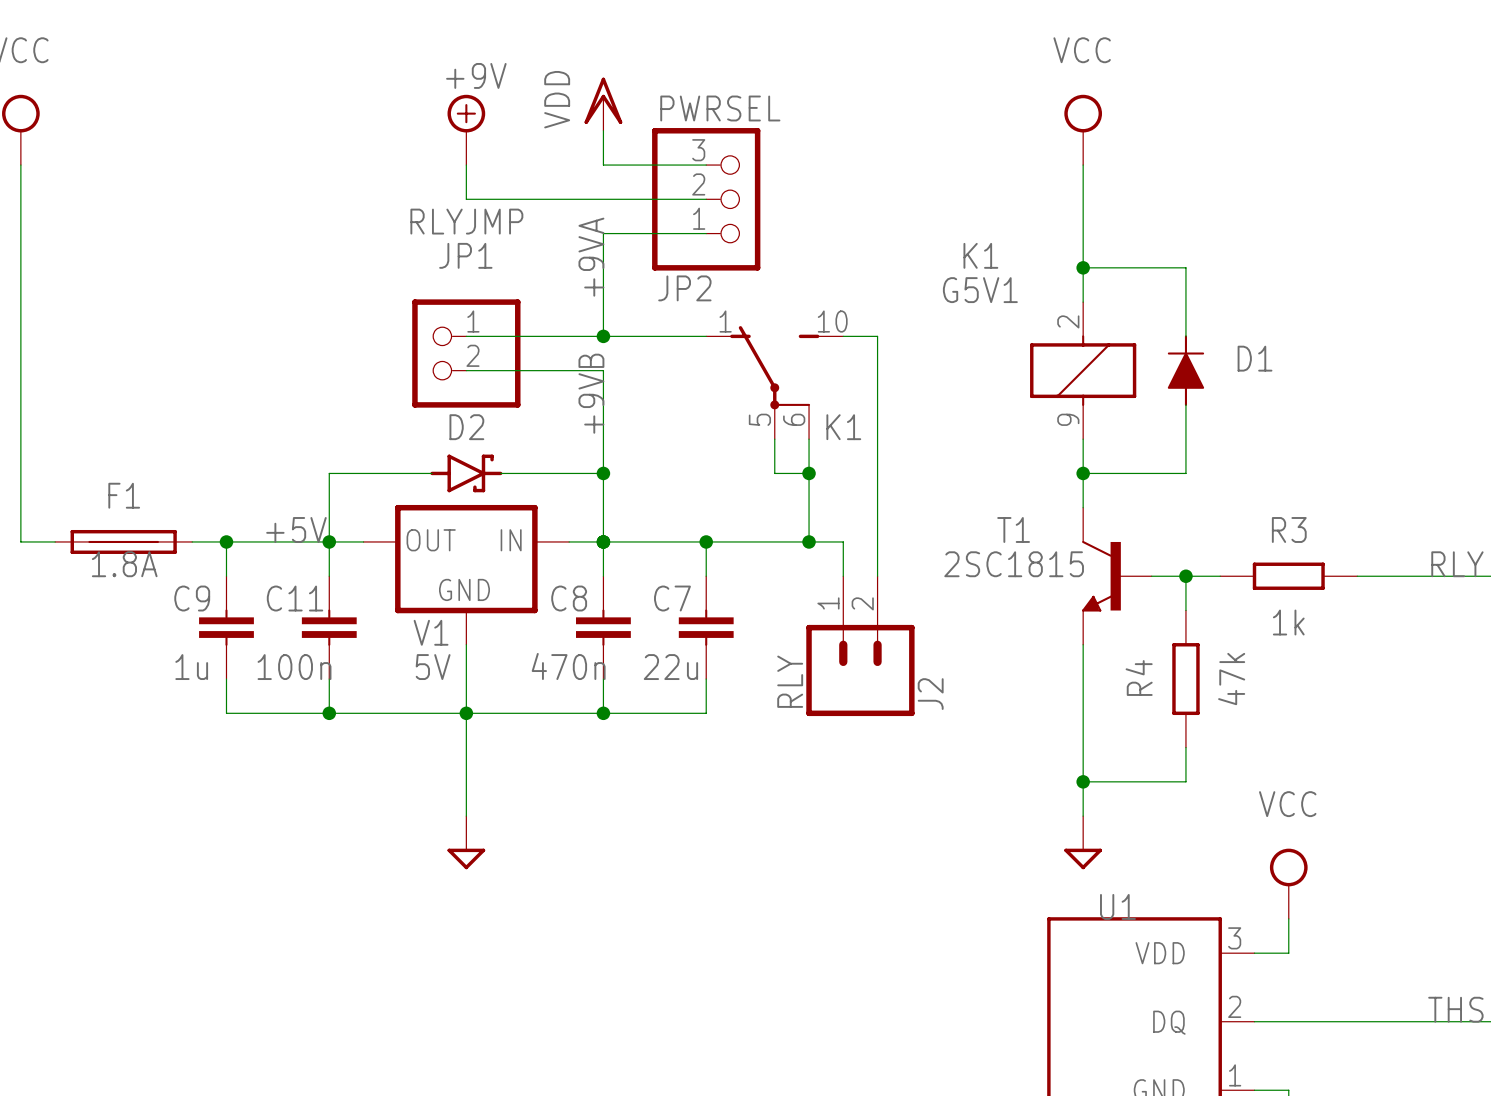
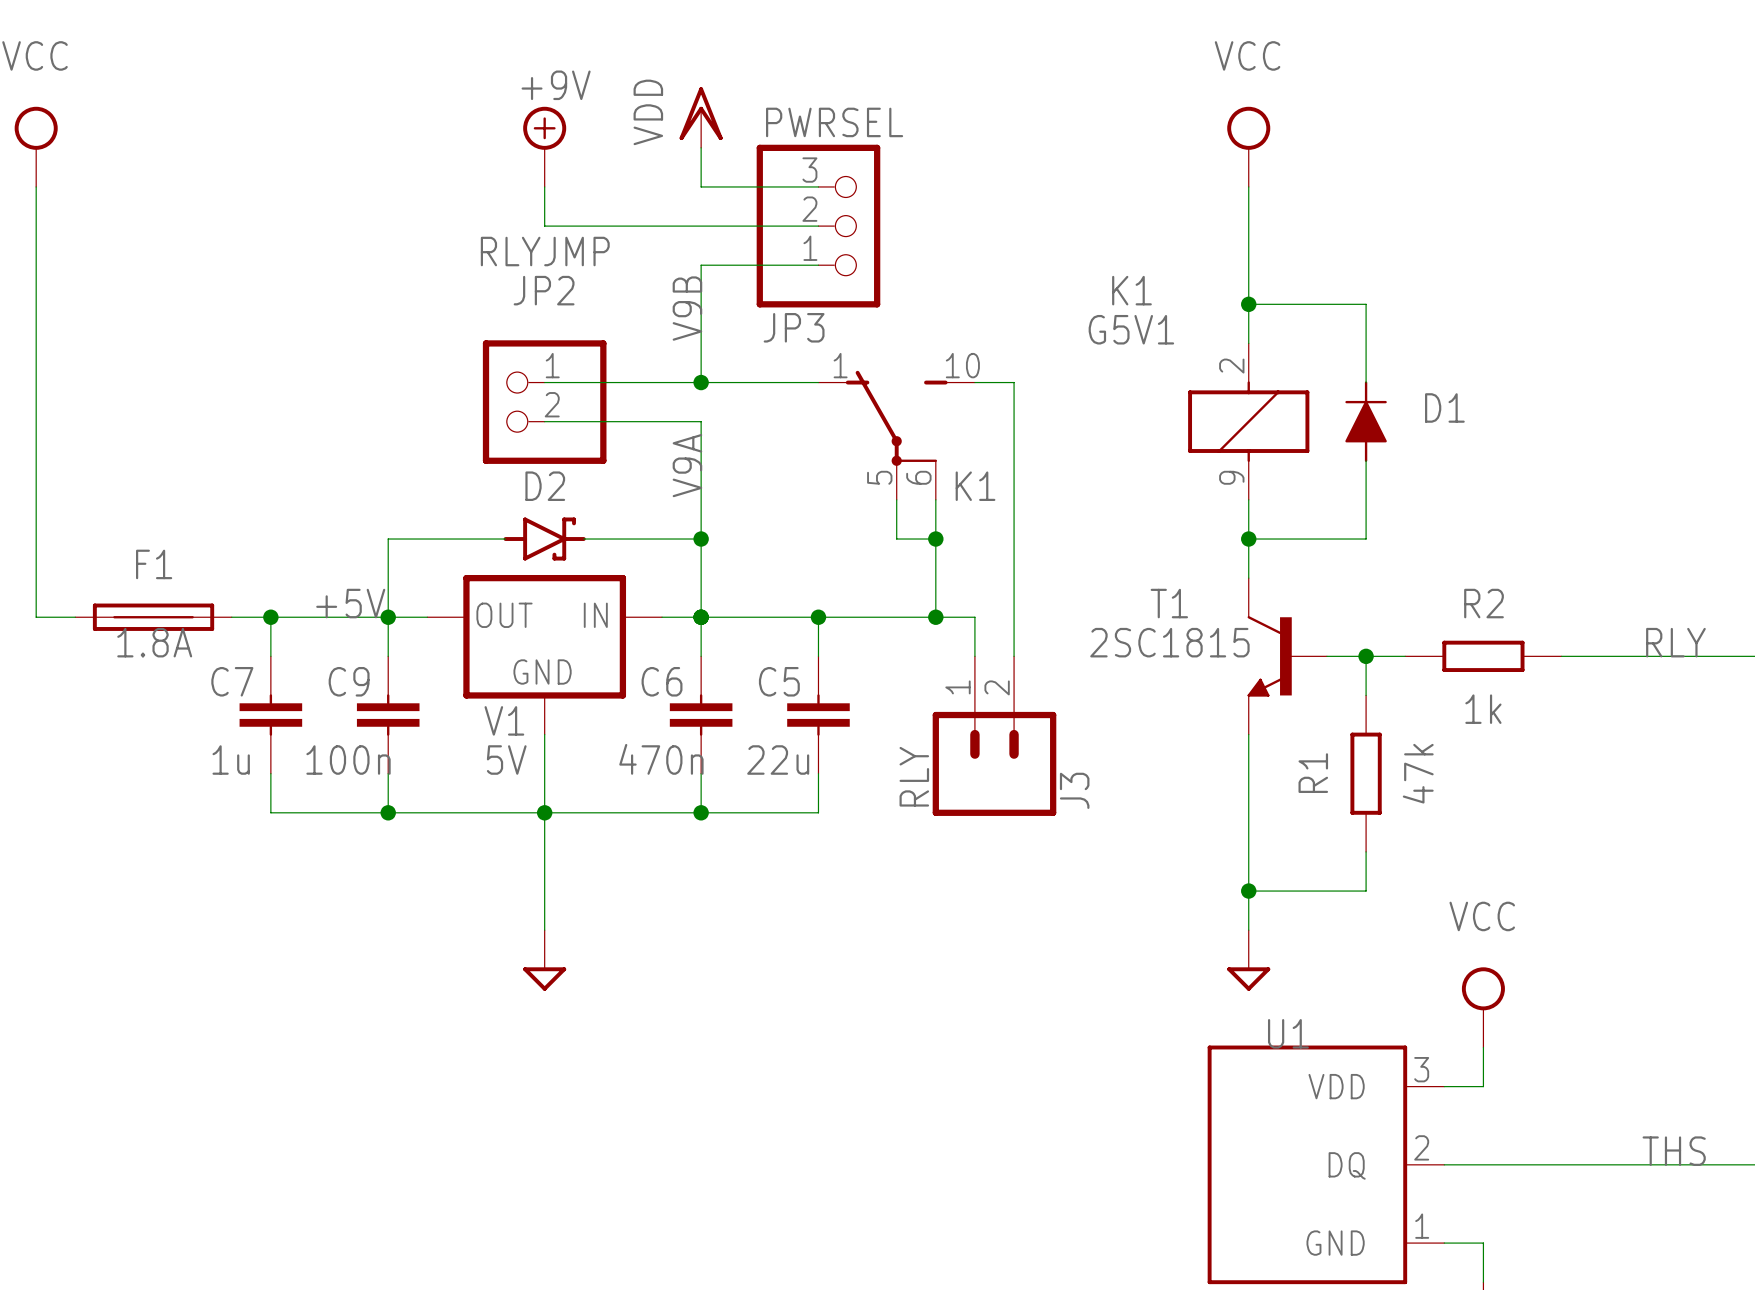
JP1 name: JP1 (465, 255) -> JP2 (544, 290)
label: +9VA (591, 257) -> V9B (687, 308)
JP2 name: JP2 (684, 288) -> JP3 (794, 327)
label: +9VB (591, 393) -> V9A (687, 465)
R3 name: R3 (1289, 529) -> R2 (1484, 603)
C9 name: C9 (192, 598) -> C7 (232, 681)
C11 name: C11 (295, 598) -> C9 (349, 681)
C8 name: C8 (569, 598) -> C6 (662, 681)
C7 name: C7 (672, 598) -> C5 (779, 681)
R4 name: R4 (1139, 678) -> R1 (1313, 773)
J2 name: J2 (930, 694) -> J3 (1074, 790)

